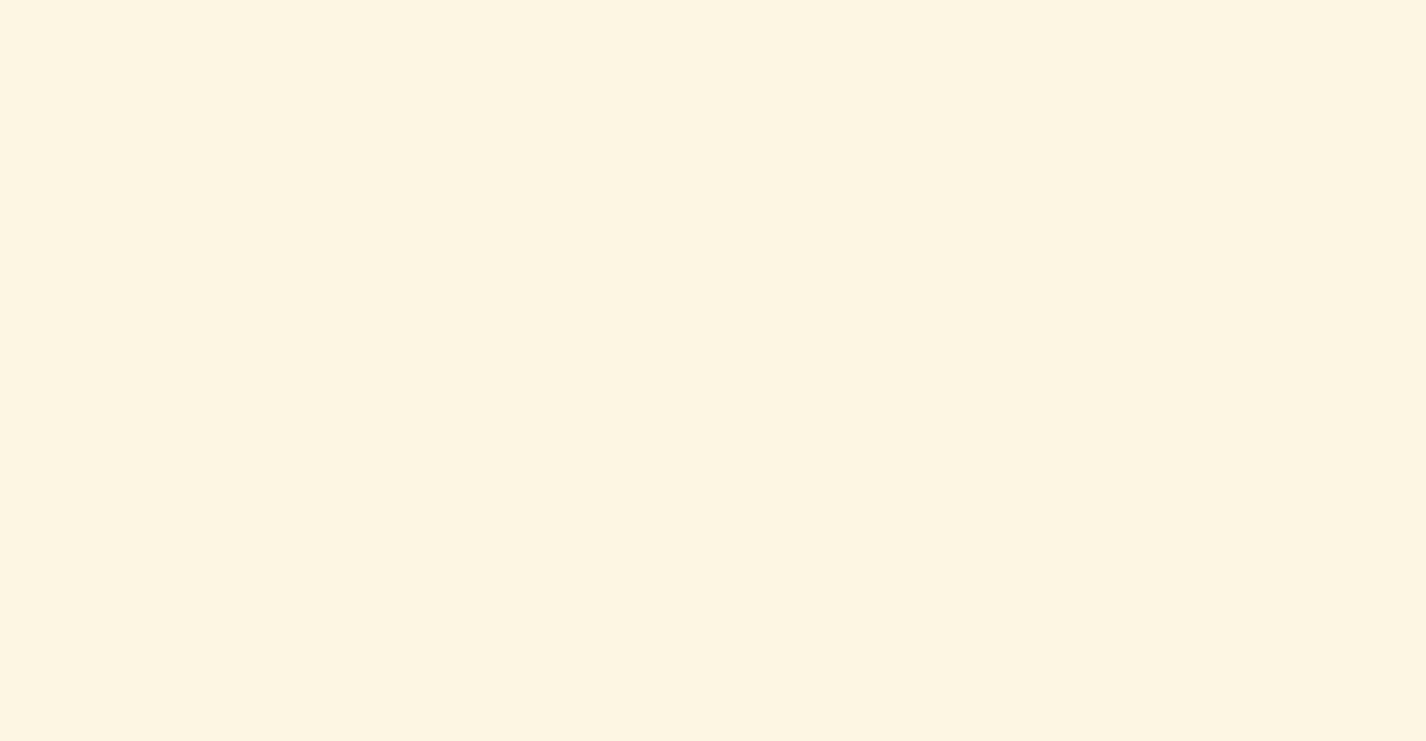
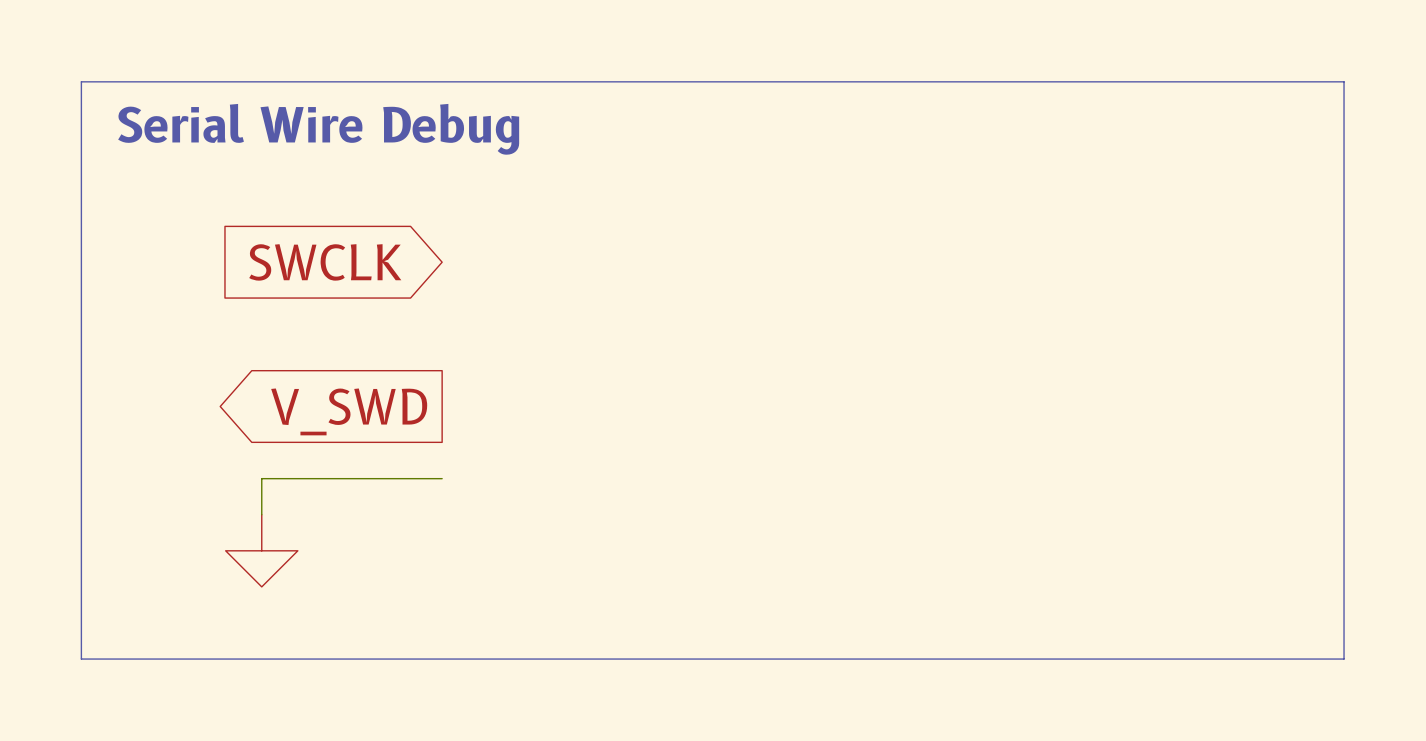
line: none -> (81, 81) (1344, 81) (1344, 659) (81, 659) (81, 81)
text: none -> Serial Wire Debug (318, 129)
global label: none -> SWCLK (325, 262)
global label: none -> V_SWD (349, 411)
wire: none -> (442, 478) (261, 478) (261, 514)
power symbol: none -> (261, 550)

